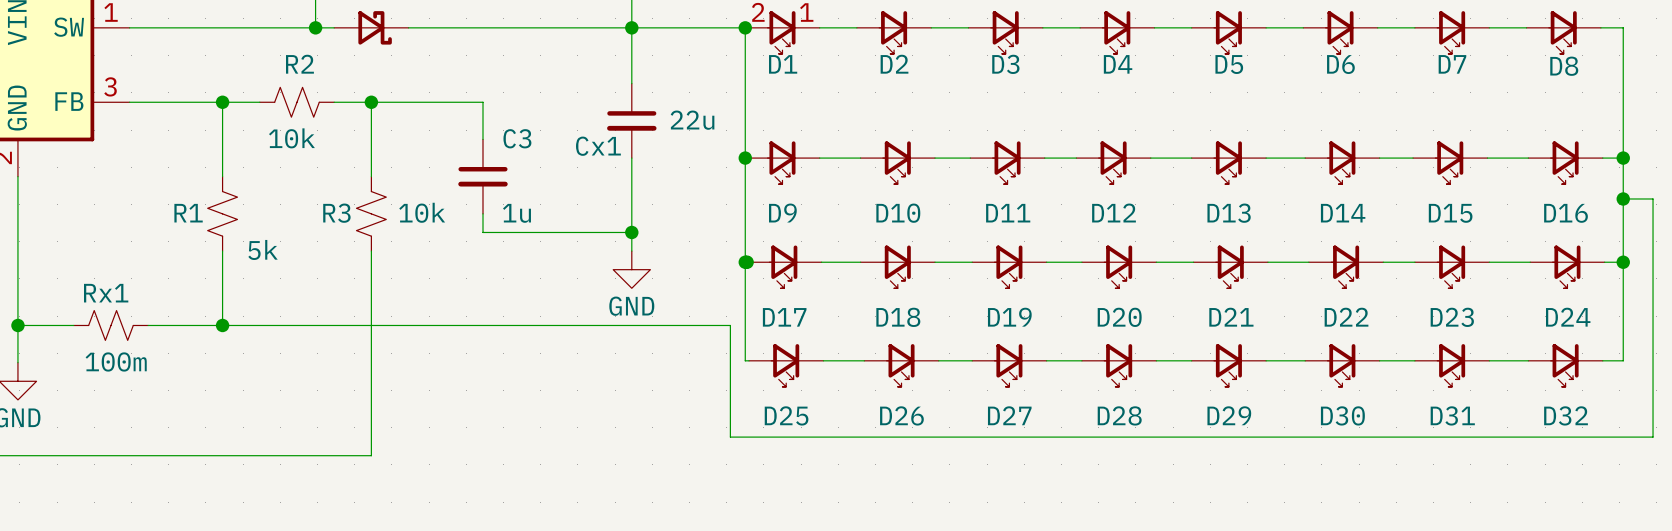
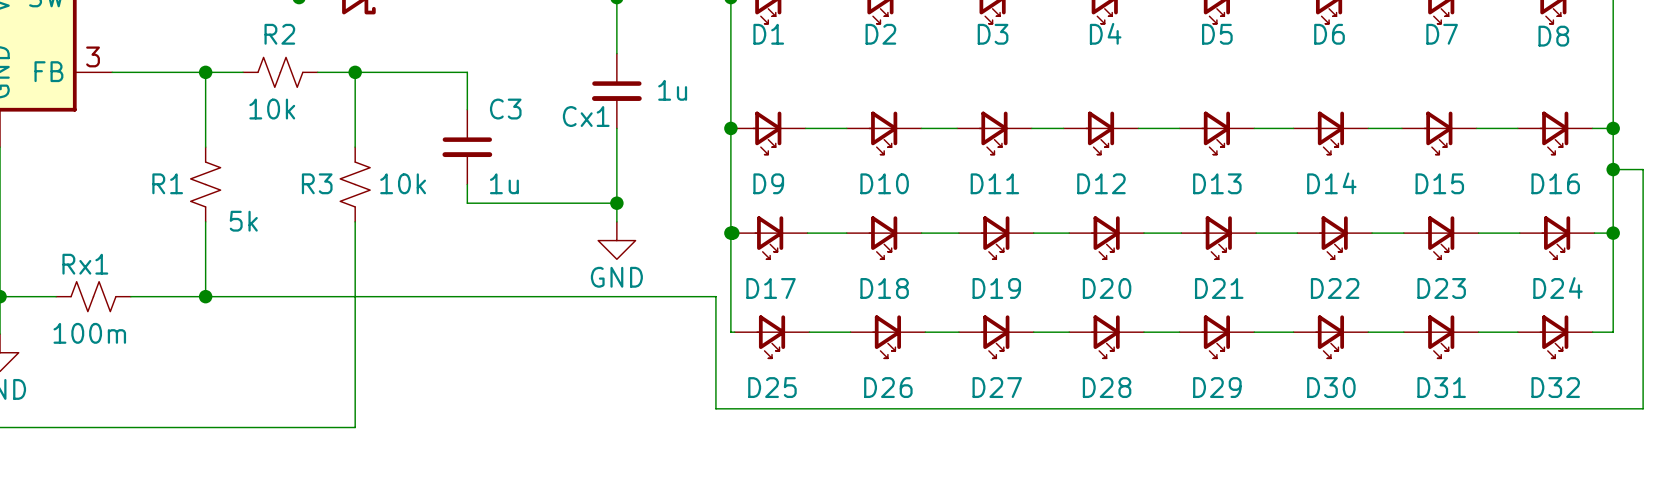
Cx1 value: 22u (692, 120) -> 1u (672, 90)

